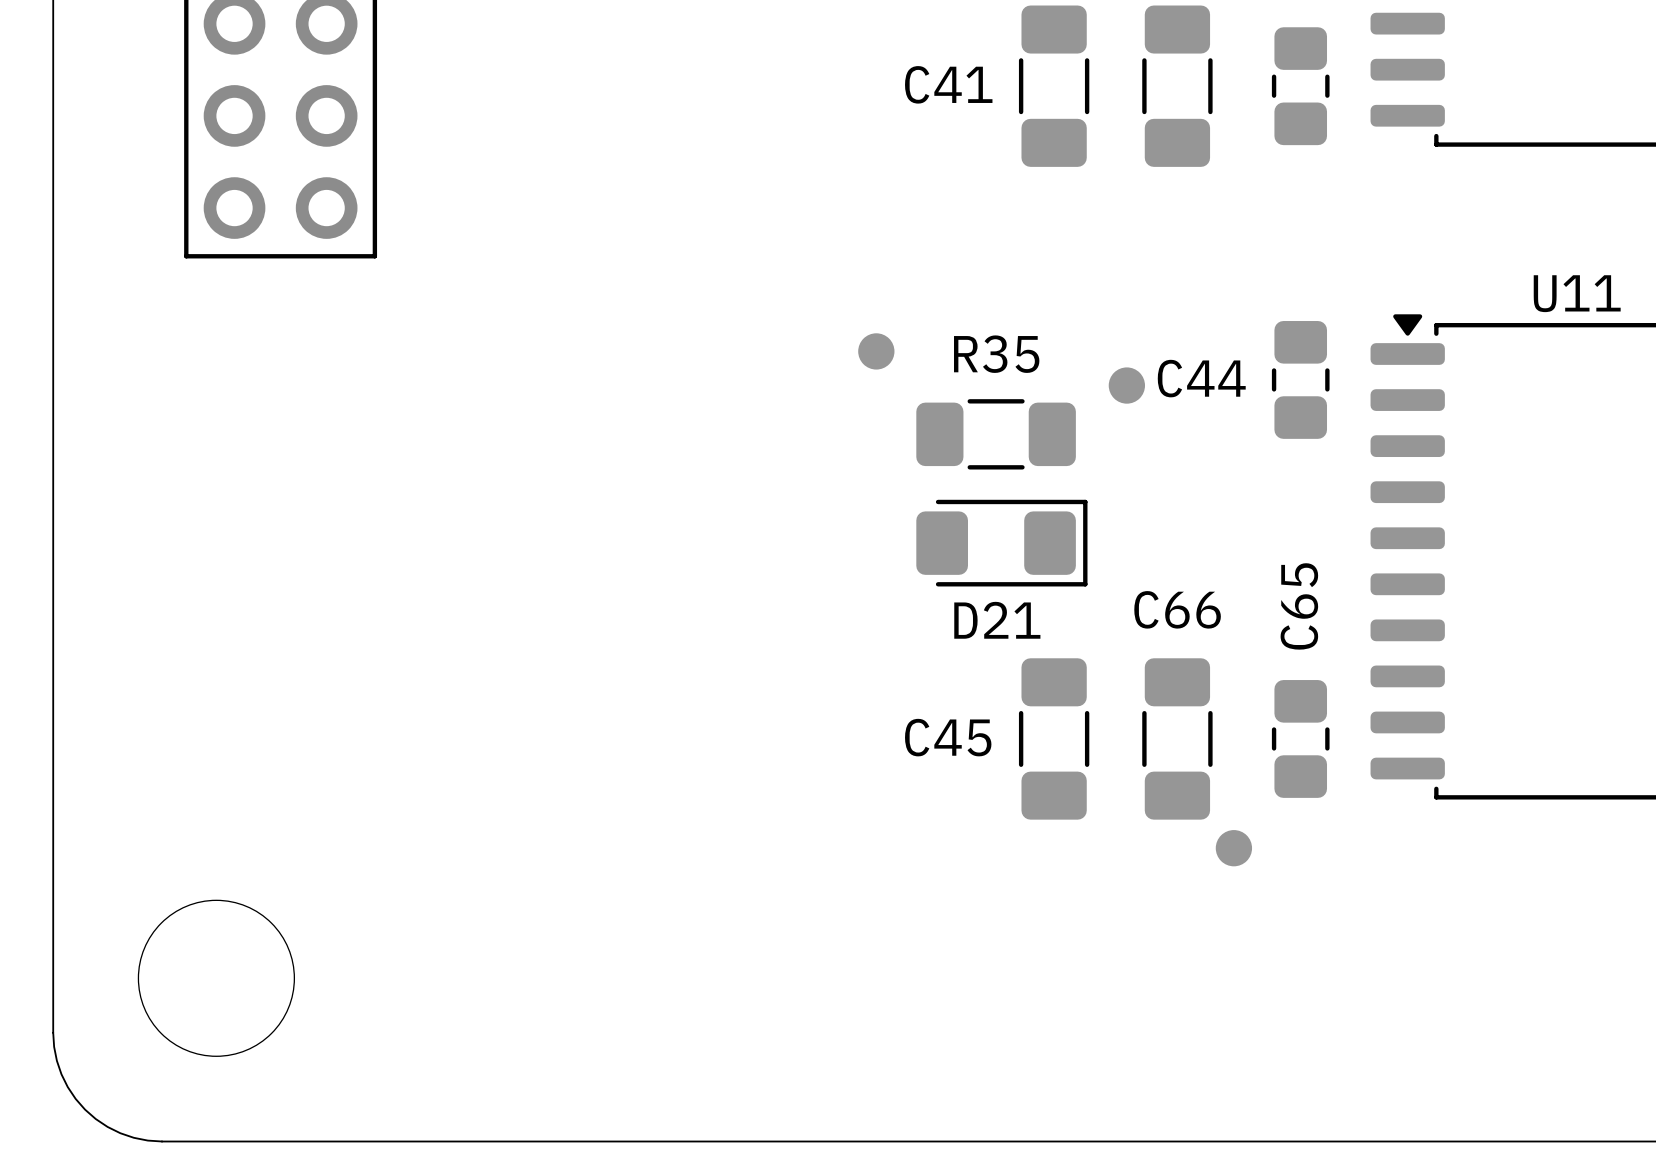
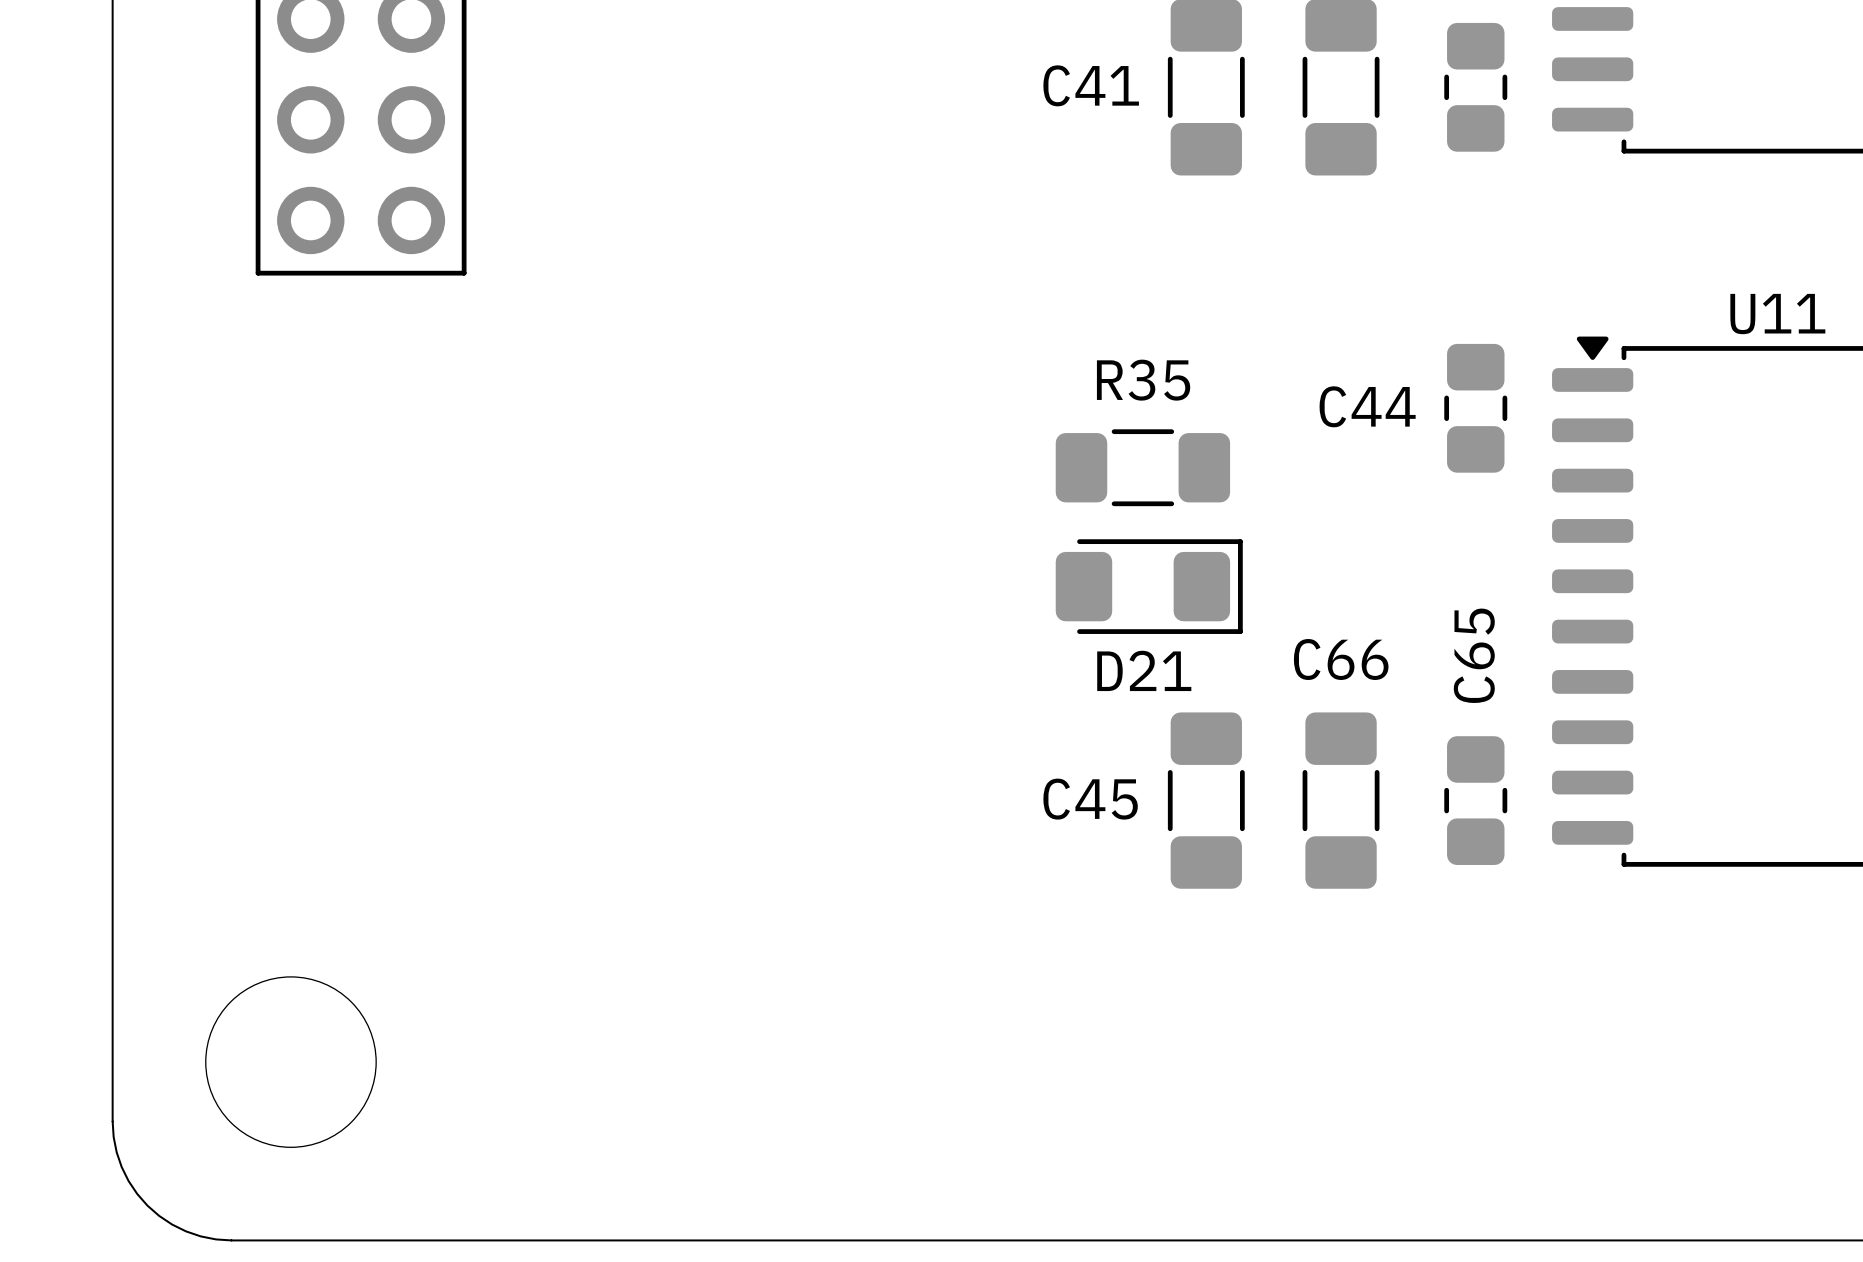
part: (876, 351) -> none
part: (1126, 385) -> none
part: (1233, 848) -> none

